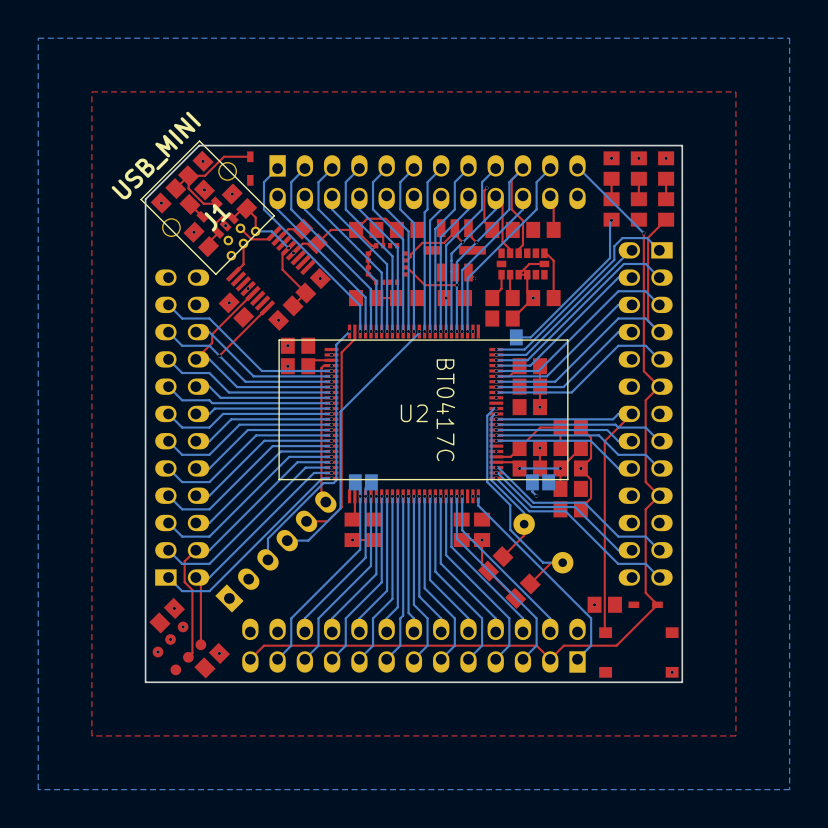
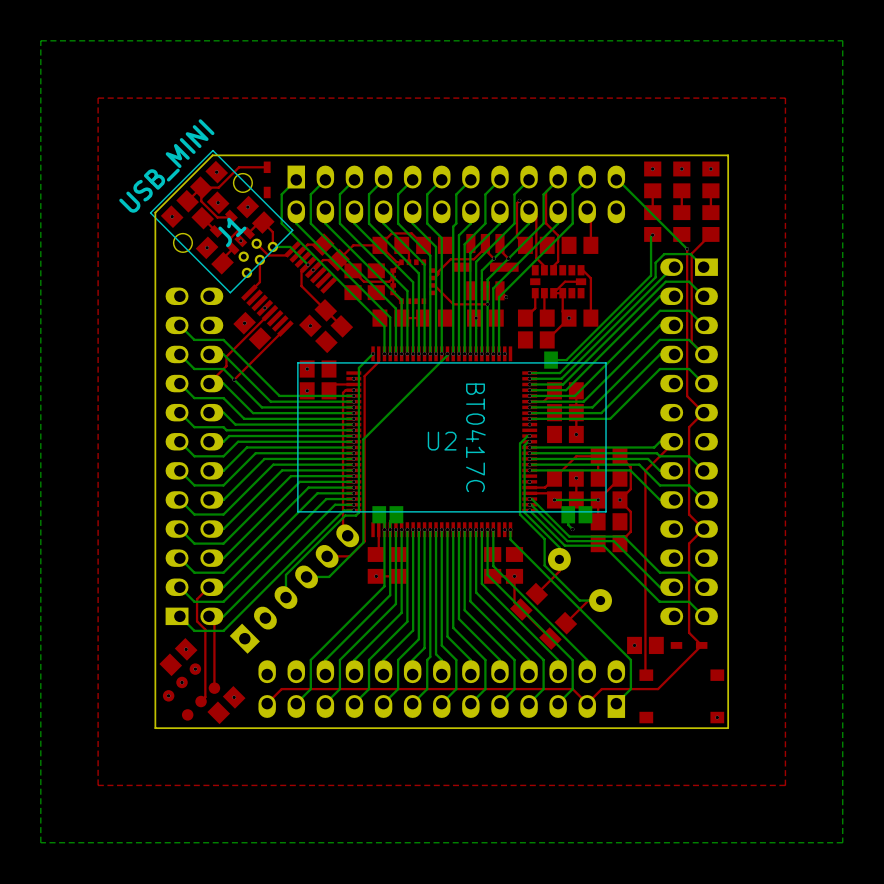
top track: none -> (353, 270) (363, 281) (389, 281) (393, 278)
part: none -> (353, 281)
part: none -> (376, 281)
top track: (282, 268) (305, 293) (293, 305) -> (301, 286) (341, 326)
via: (320, 278) -> none
part: (313, 285) -> none
part: none -> (318, 318)
part: (285, 313) -> none
part: none -> (334, 334)
via position: (278, 320) -> (310, 325)

